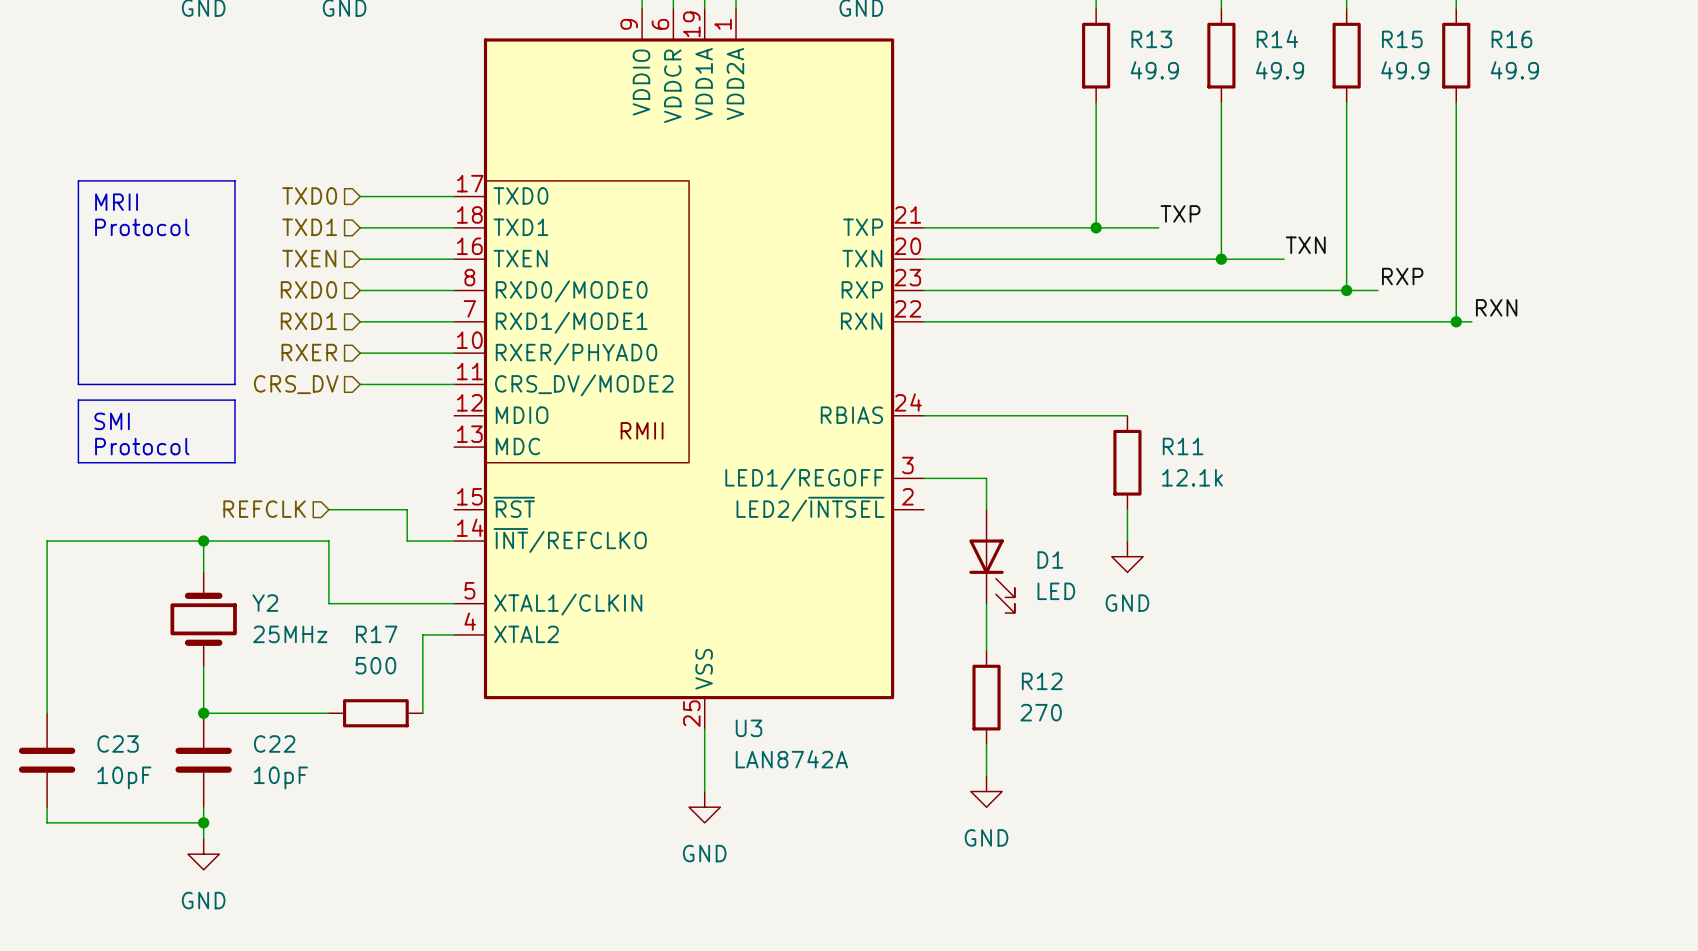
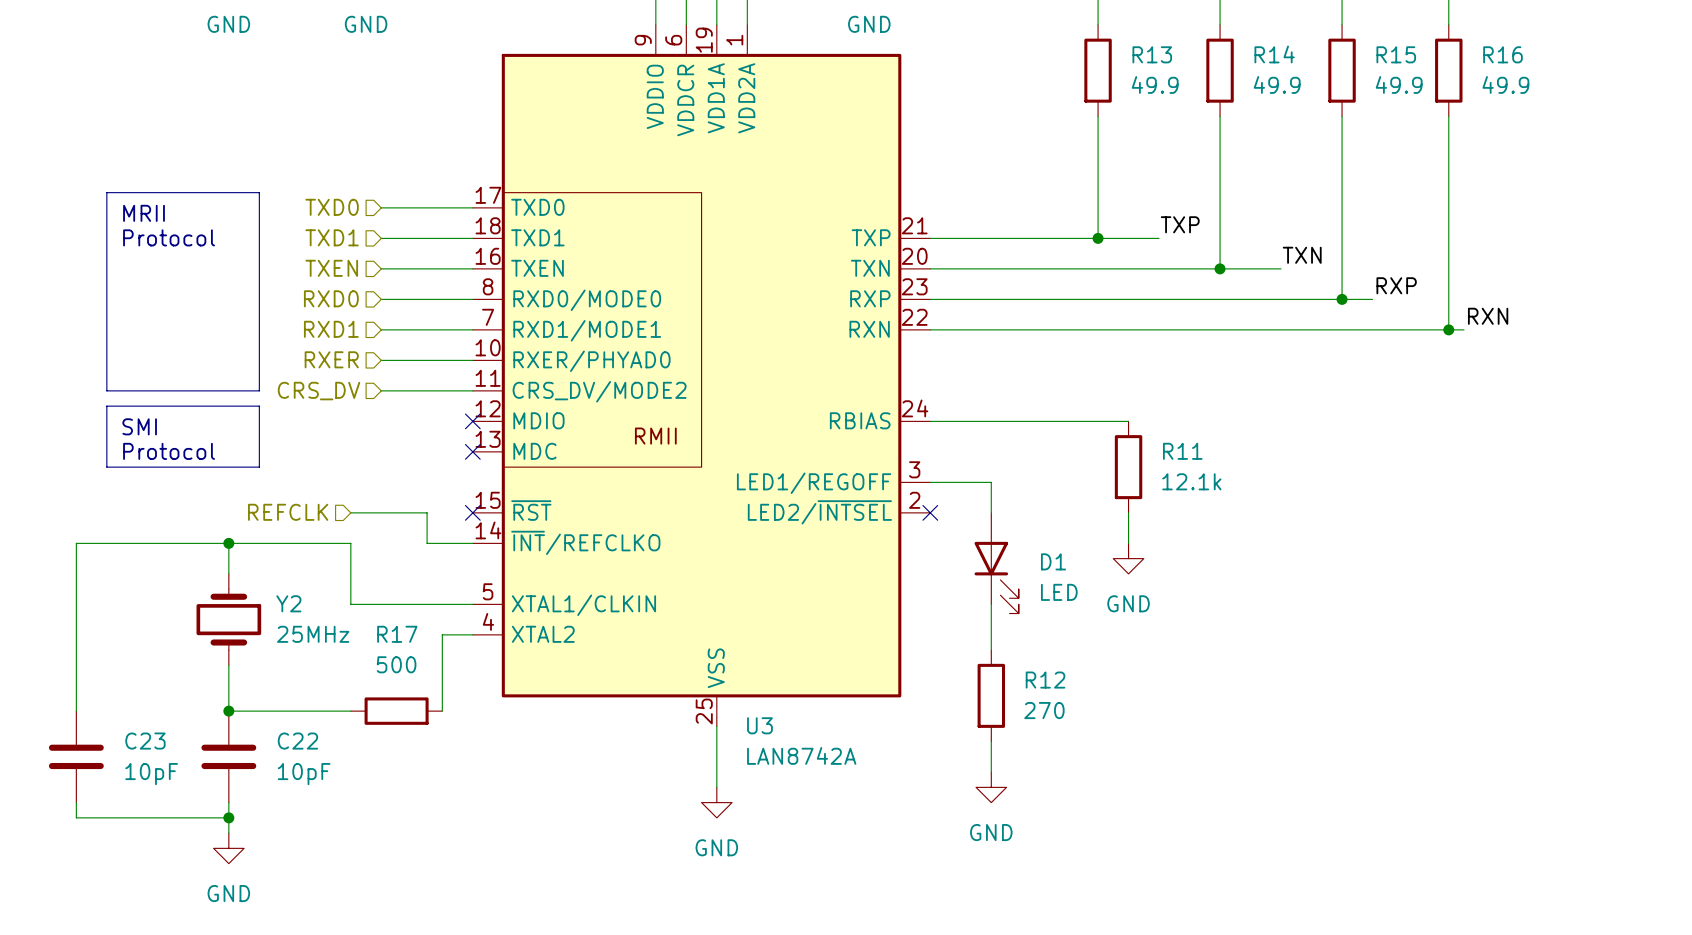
no-connect mark: none -> (472, 421)
no-connect mark: none -> (472, 451)
no-connect mark: none -> (472, 512)
no-connect mark: none -> (930, 512)

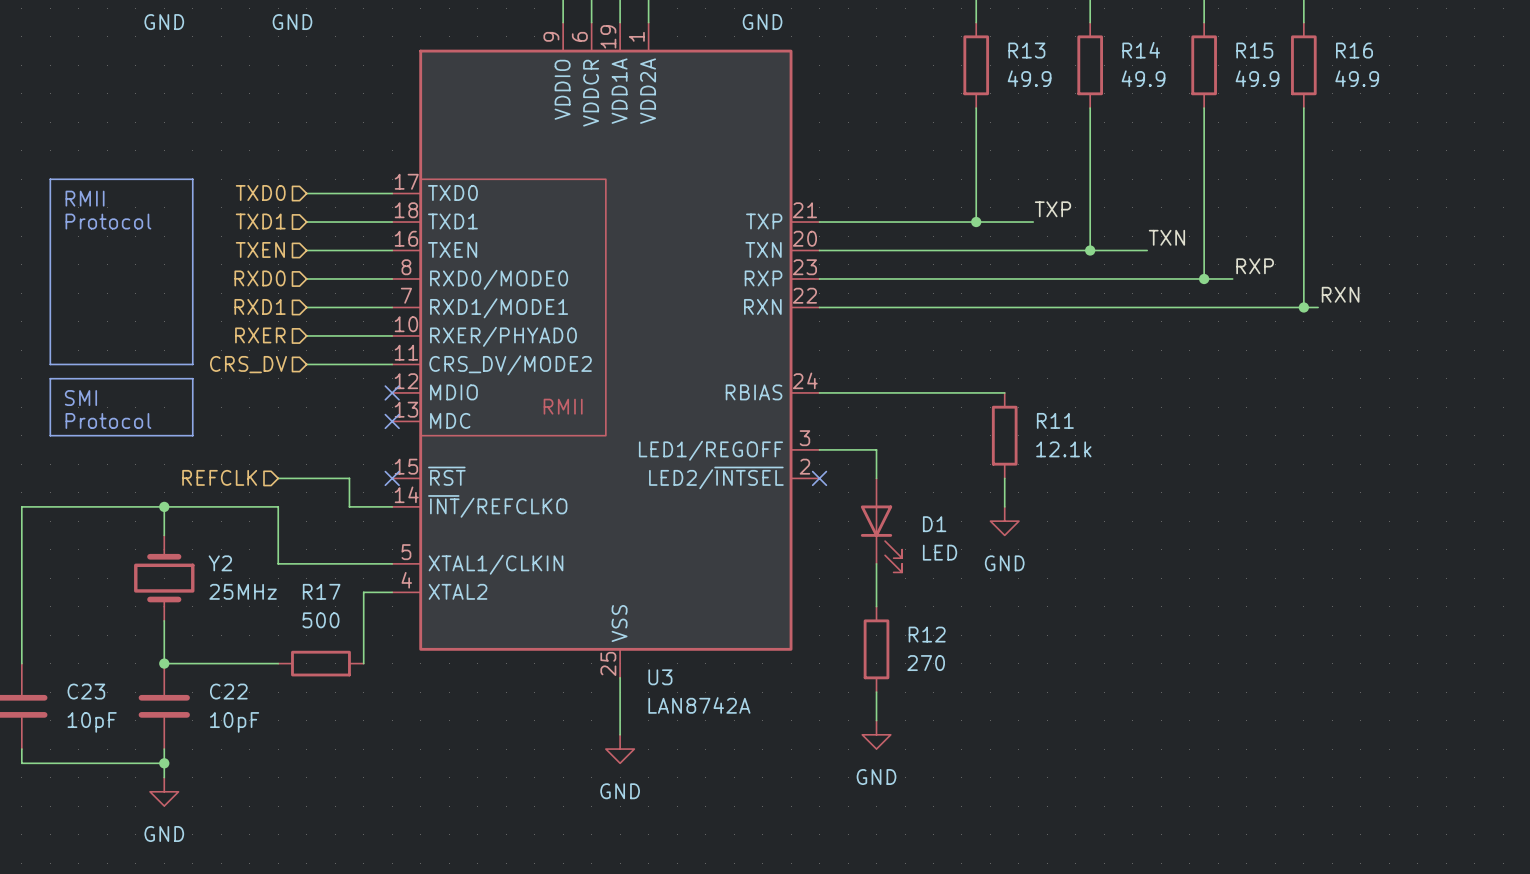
text: MRII (144, 213) -> RMII (85, 198)

